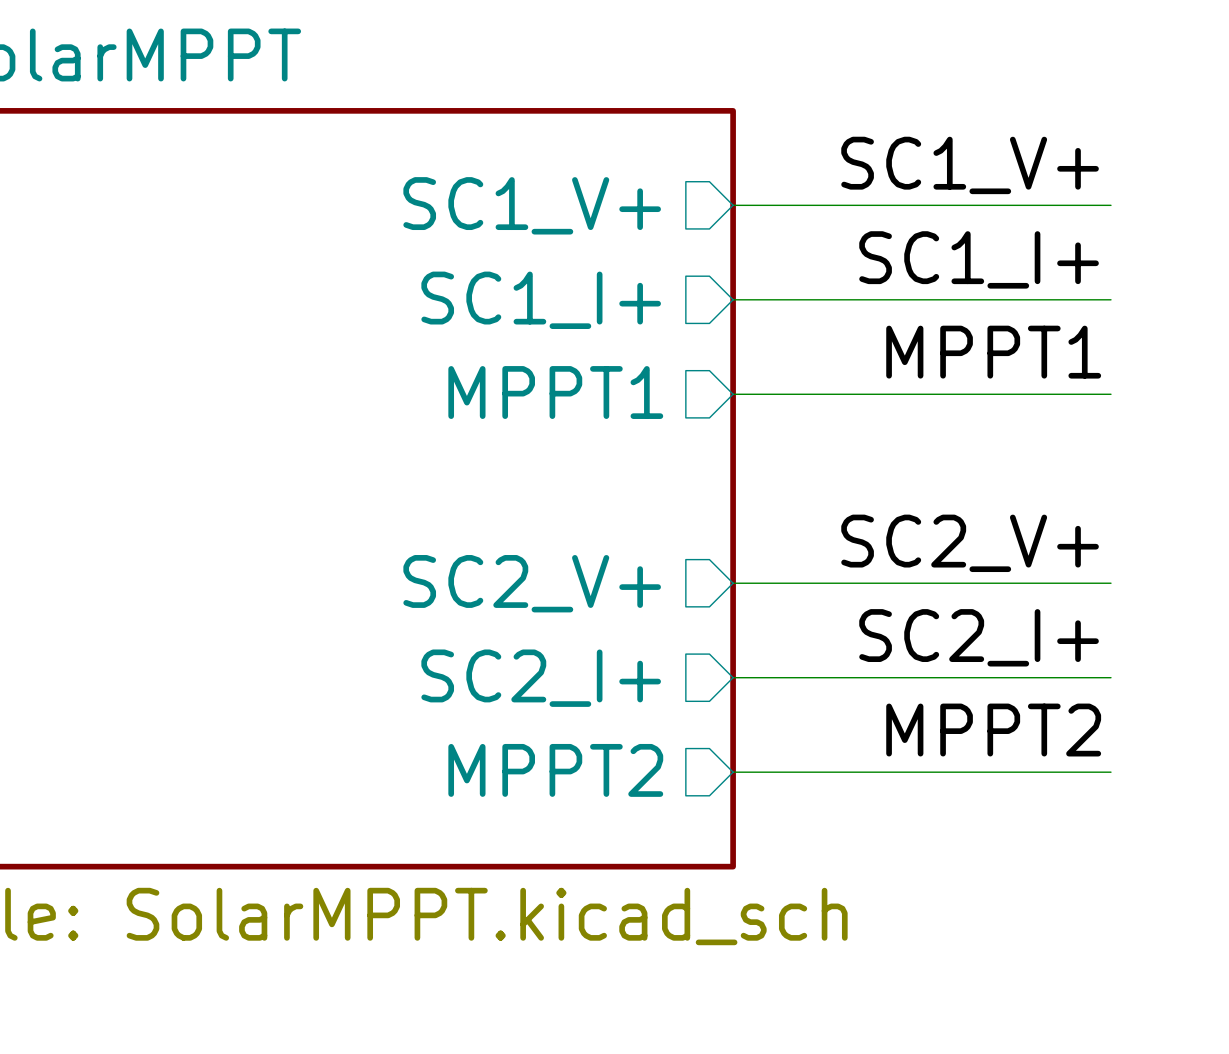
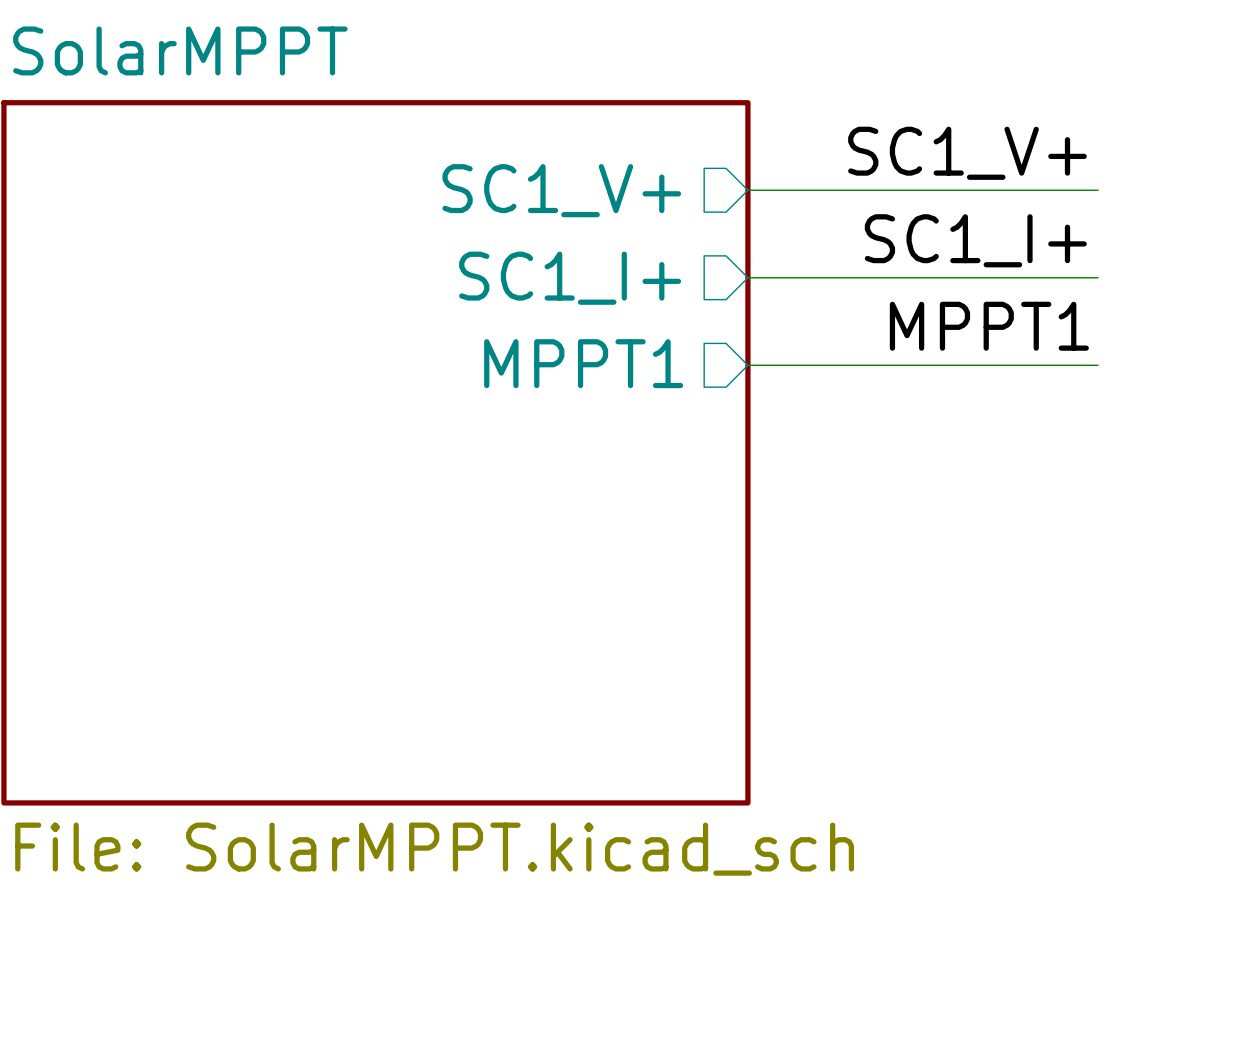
label: SC2_V+ (970, 543) -> none
sheet pin: SC2_V+ (532, 583) -> none
wire: (733, 583) (1110, 583) -> none
label: SC2_I+ (979, 637) -> none
wire: (733, 677) (1110, 677) -> none
sheet pin: SC2_I+ (541, 678) -> none
label: MPPT2 (993, 730) -> none
sheet pin: MPPT2 (555, 770) -> none
wire: (733, 772) (1110, 772) -> none

